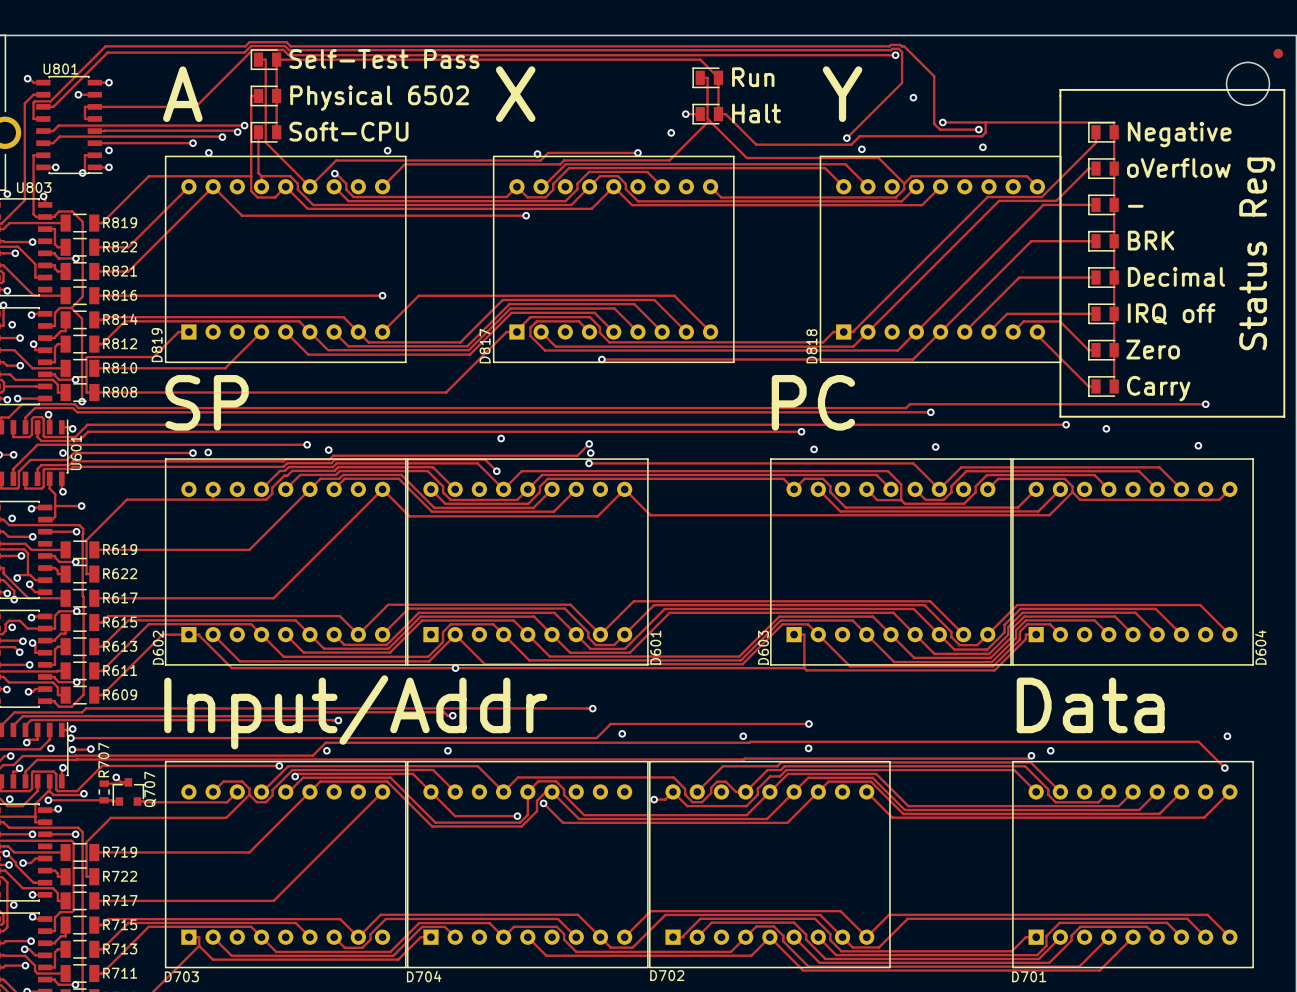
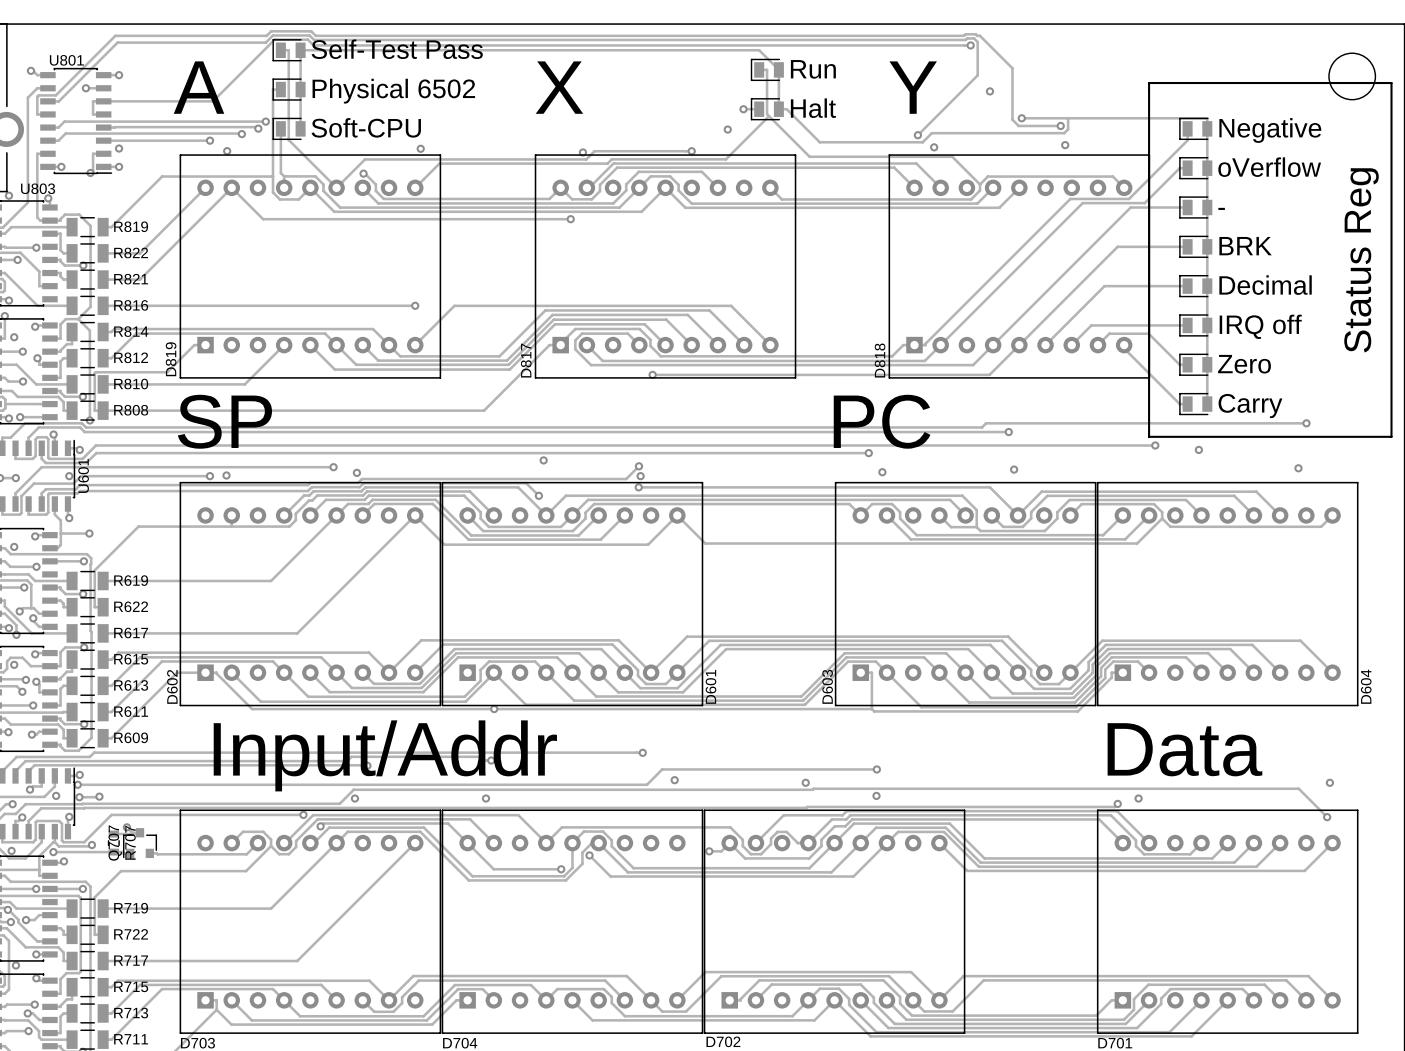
part: (1278, 53) -> none
R707 name position: R707 (103, 760) -> R707 (130, 842)
Q707 name position: Q707 (150, 789) -> Q707 (115, 843)

